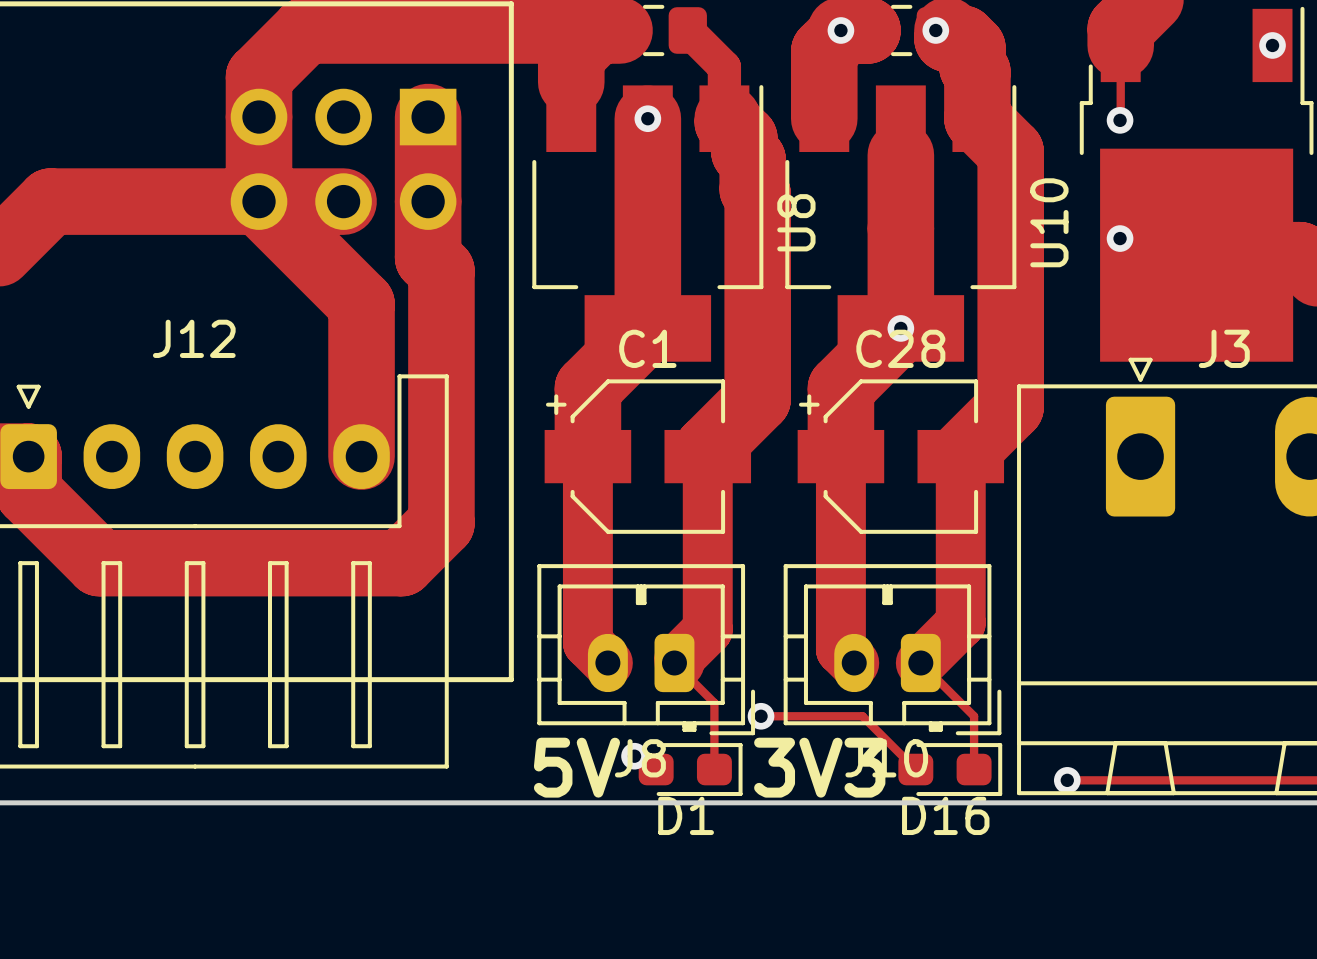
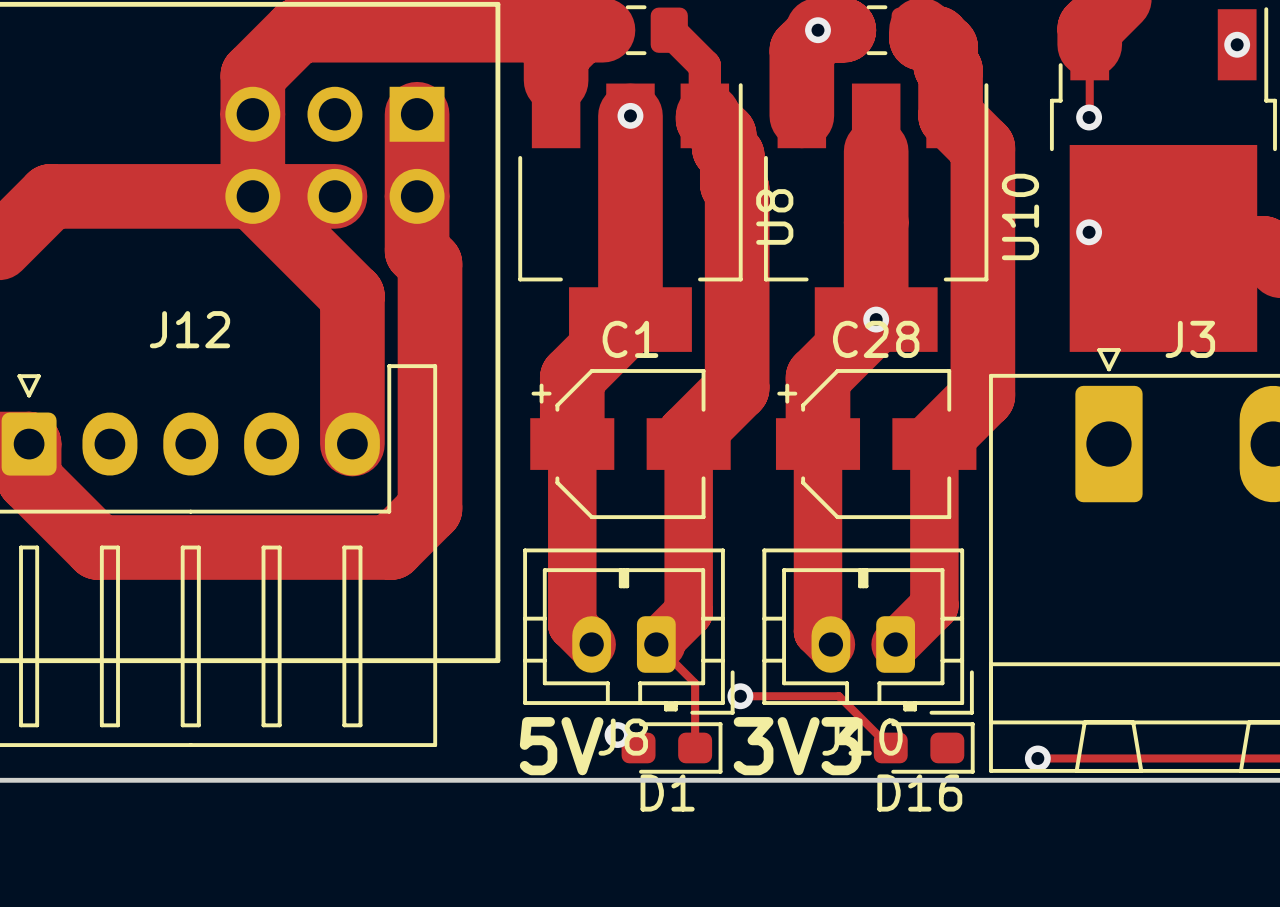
via: (935, 30) -> none
track: (920, 663) (974, 716) (974, 769) -> none

